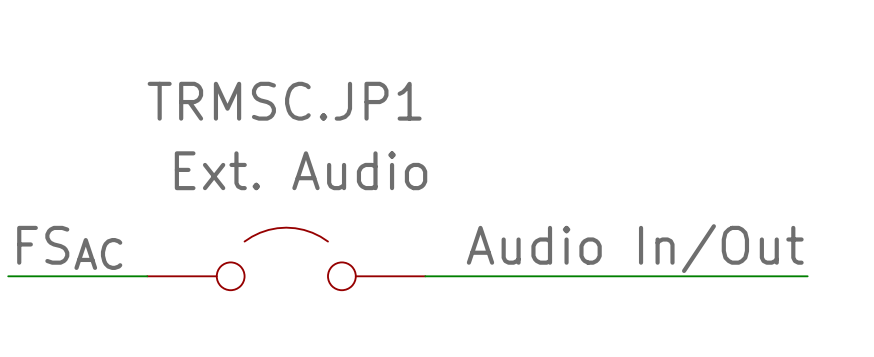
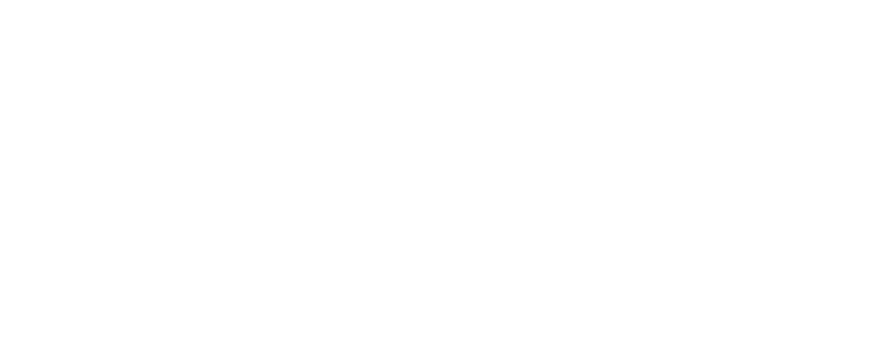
label: FSAC (69, 247) -> none
label: Audio In/Out (635, 248) -> none
TRMSC.JP1: (286, 258) -> none
wire: (8, 276) (147, 276) -> none
wire: (425, 276) (807, 276) -> none

